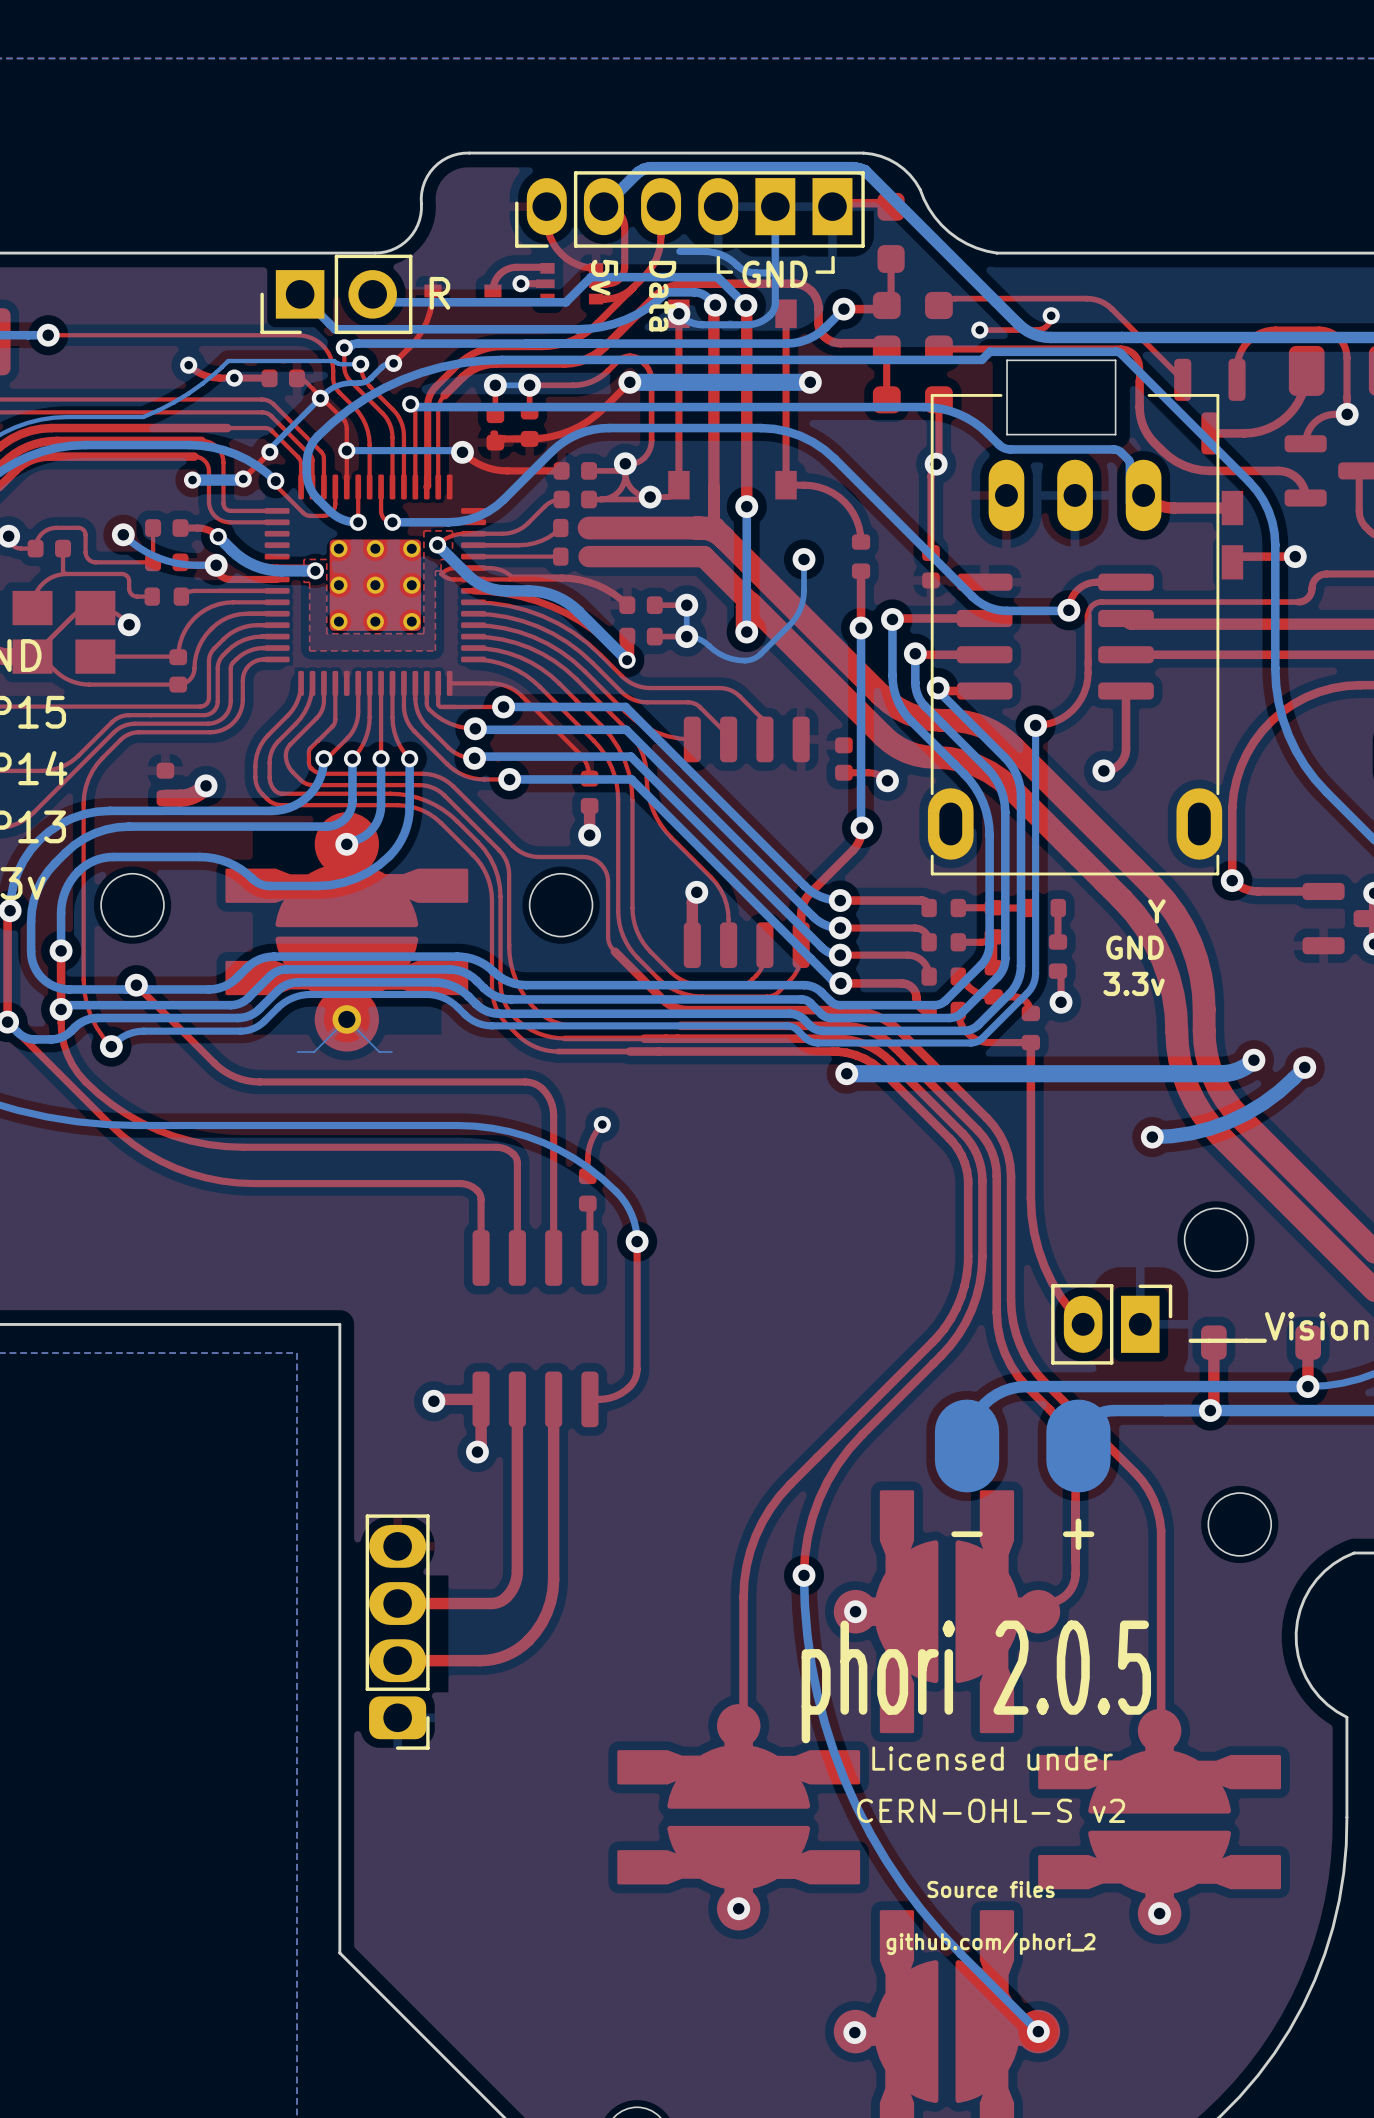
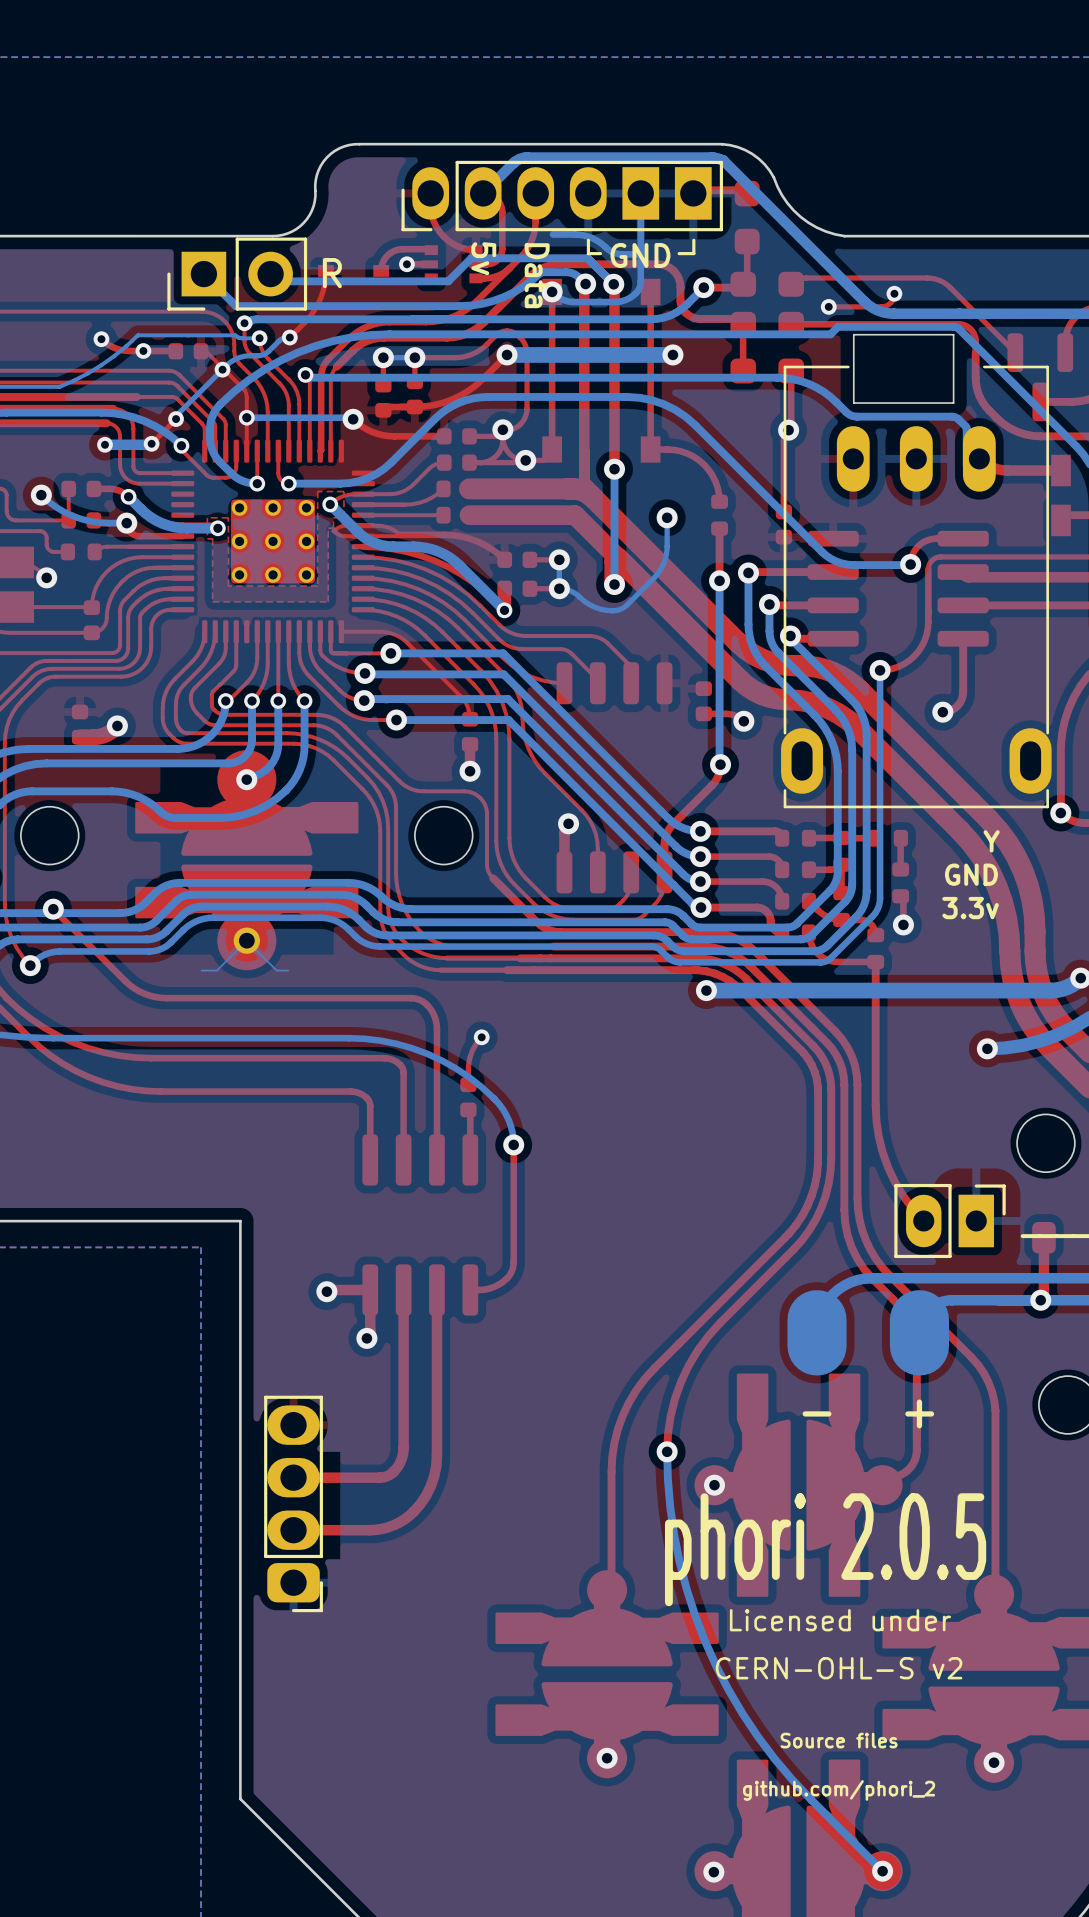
top track: (495, 433) (493, 433) -> none

